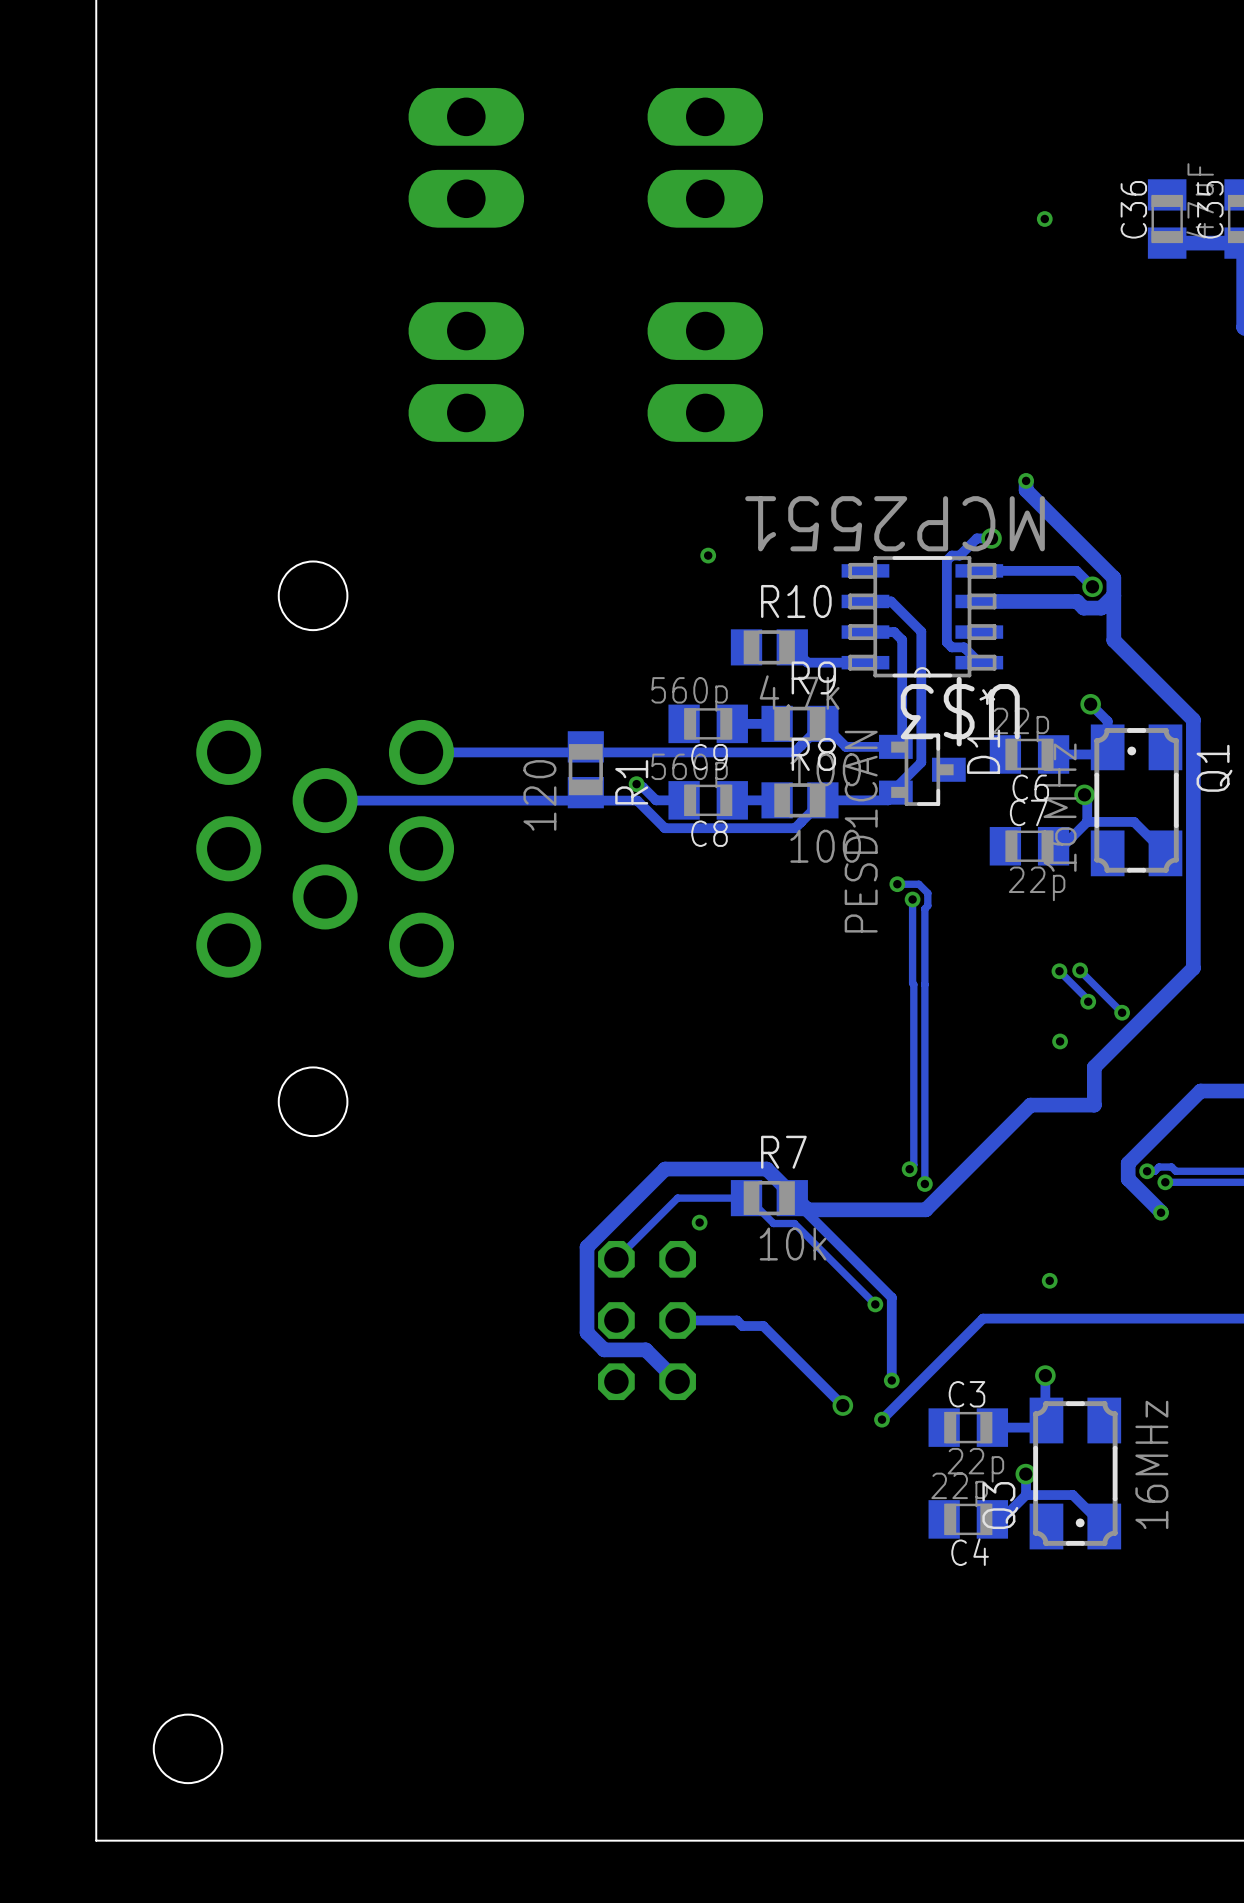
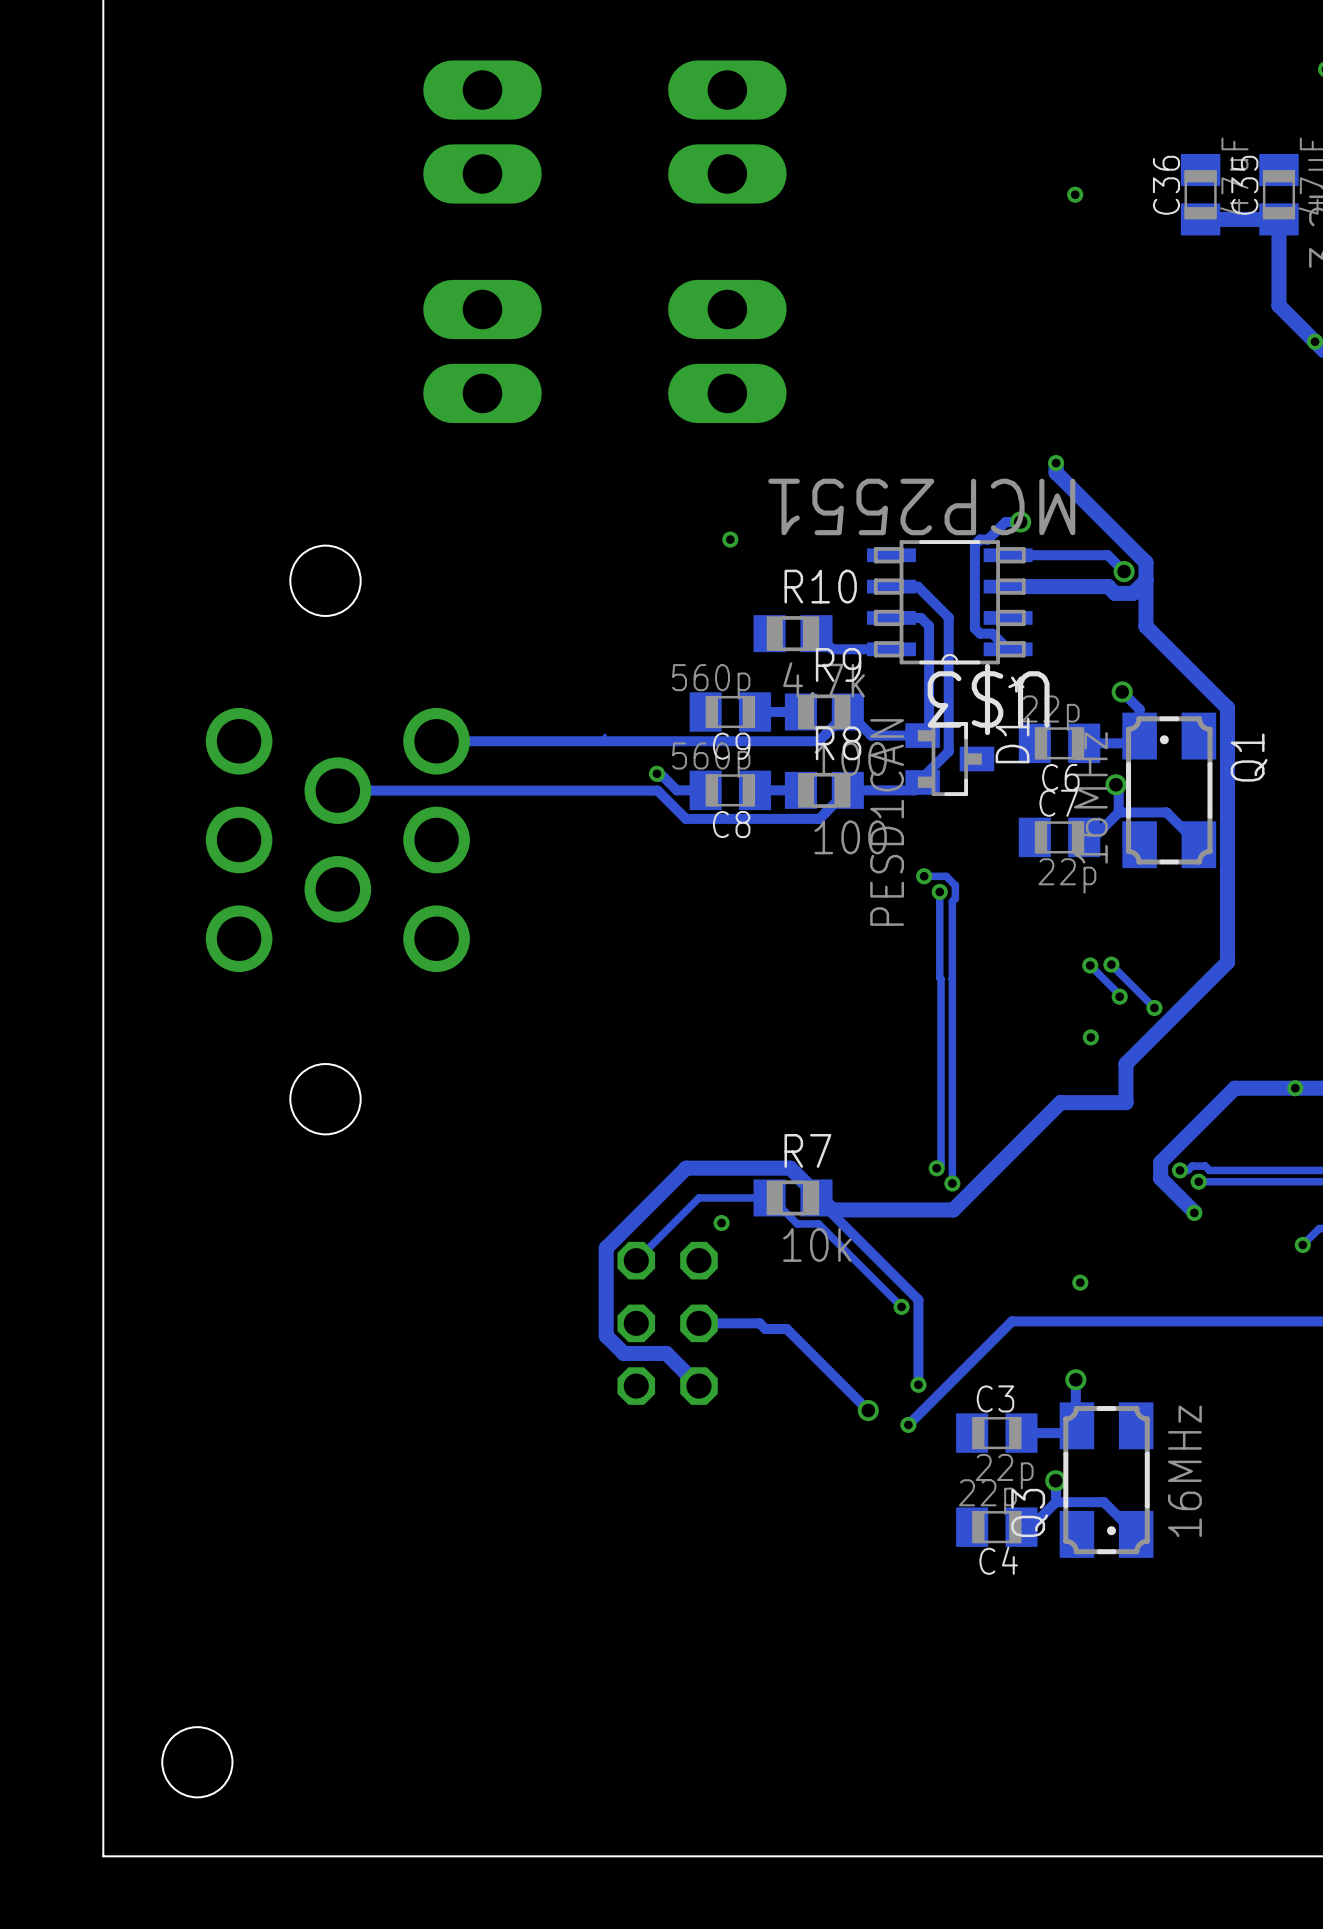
R1: 120 (585, 769) -> none

